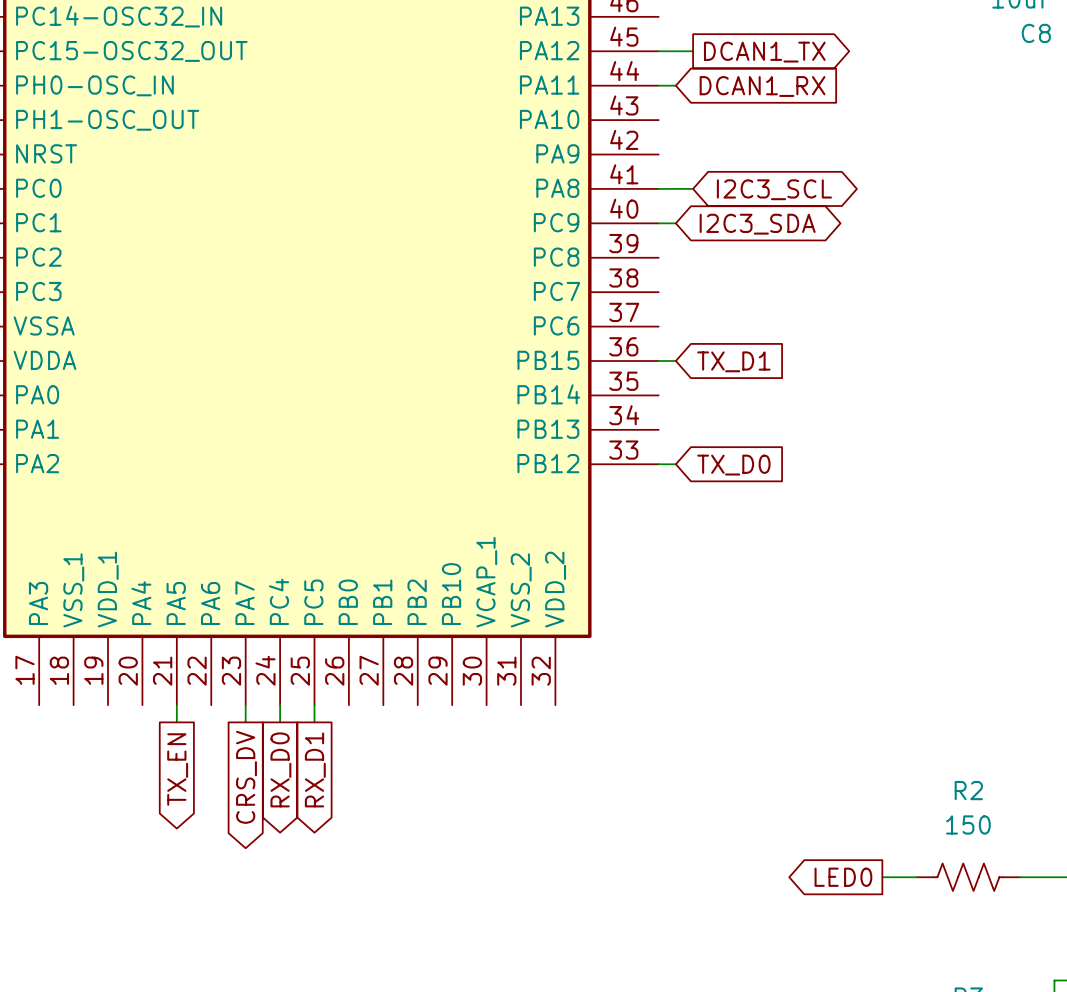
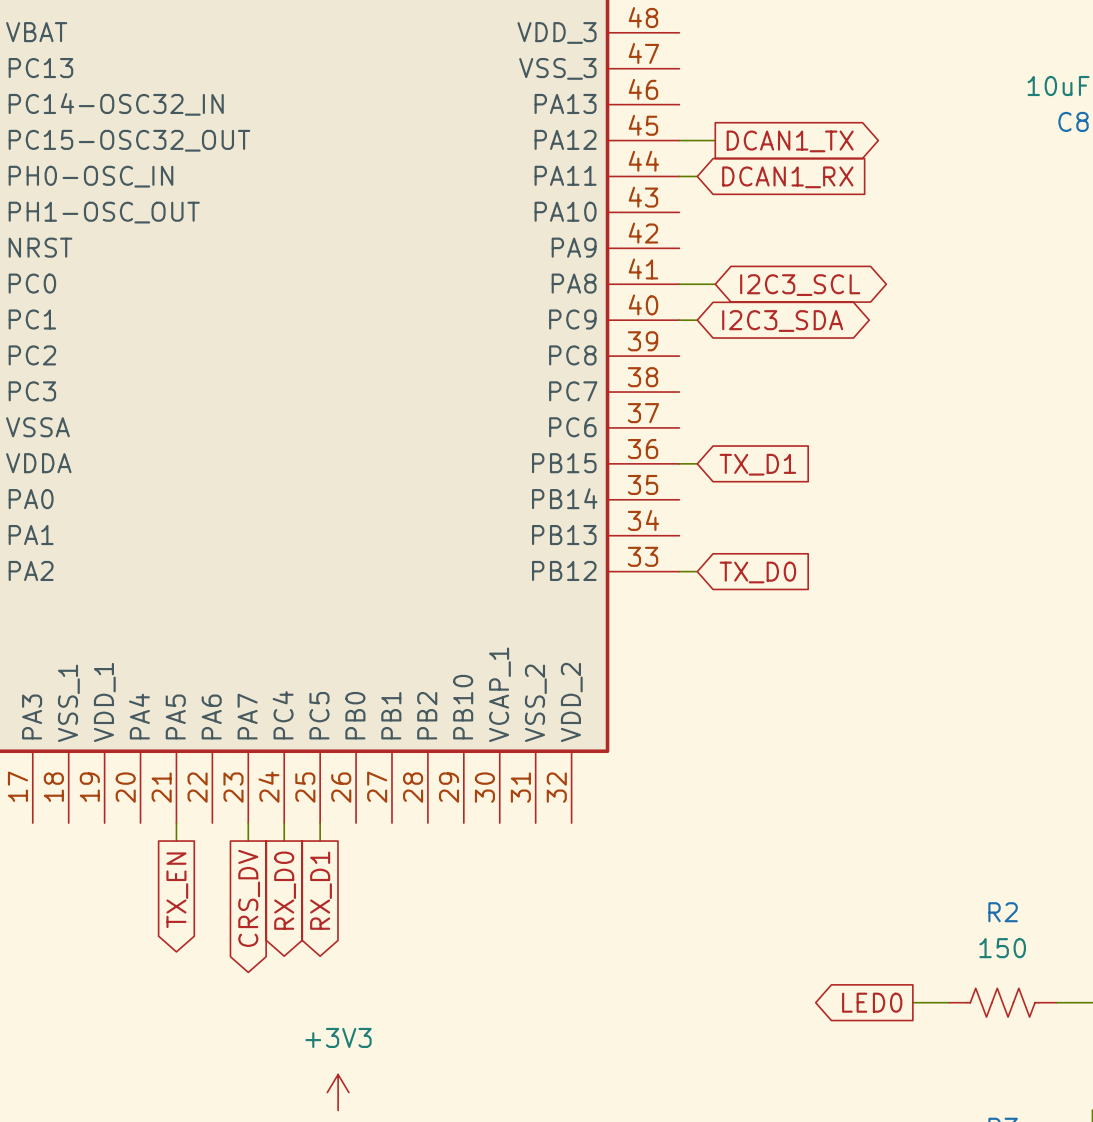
power symbol: none -> +3V3 (338, 1092)

